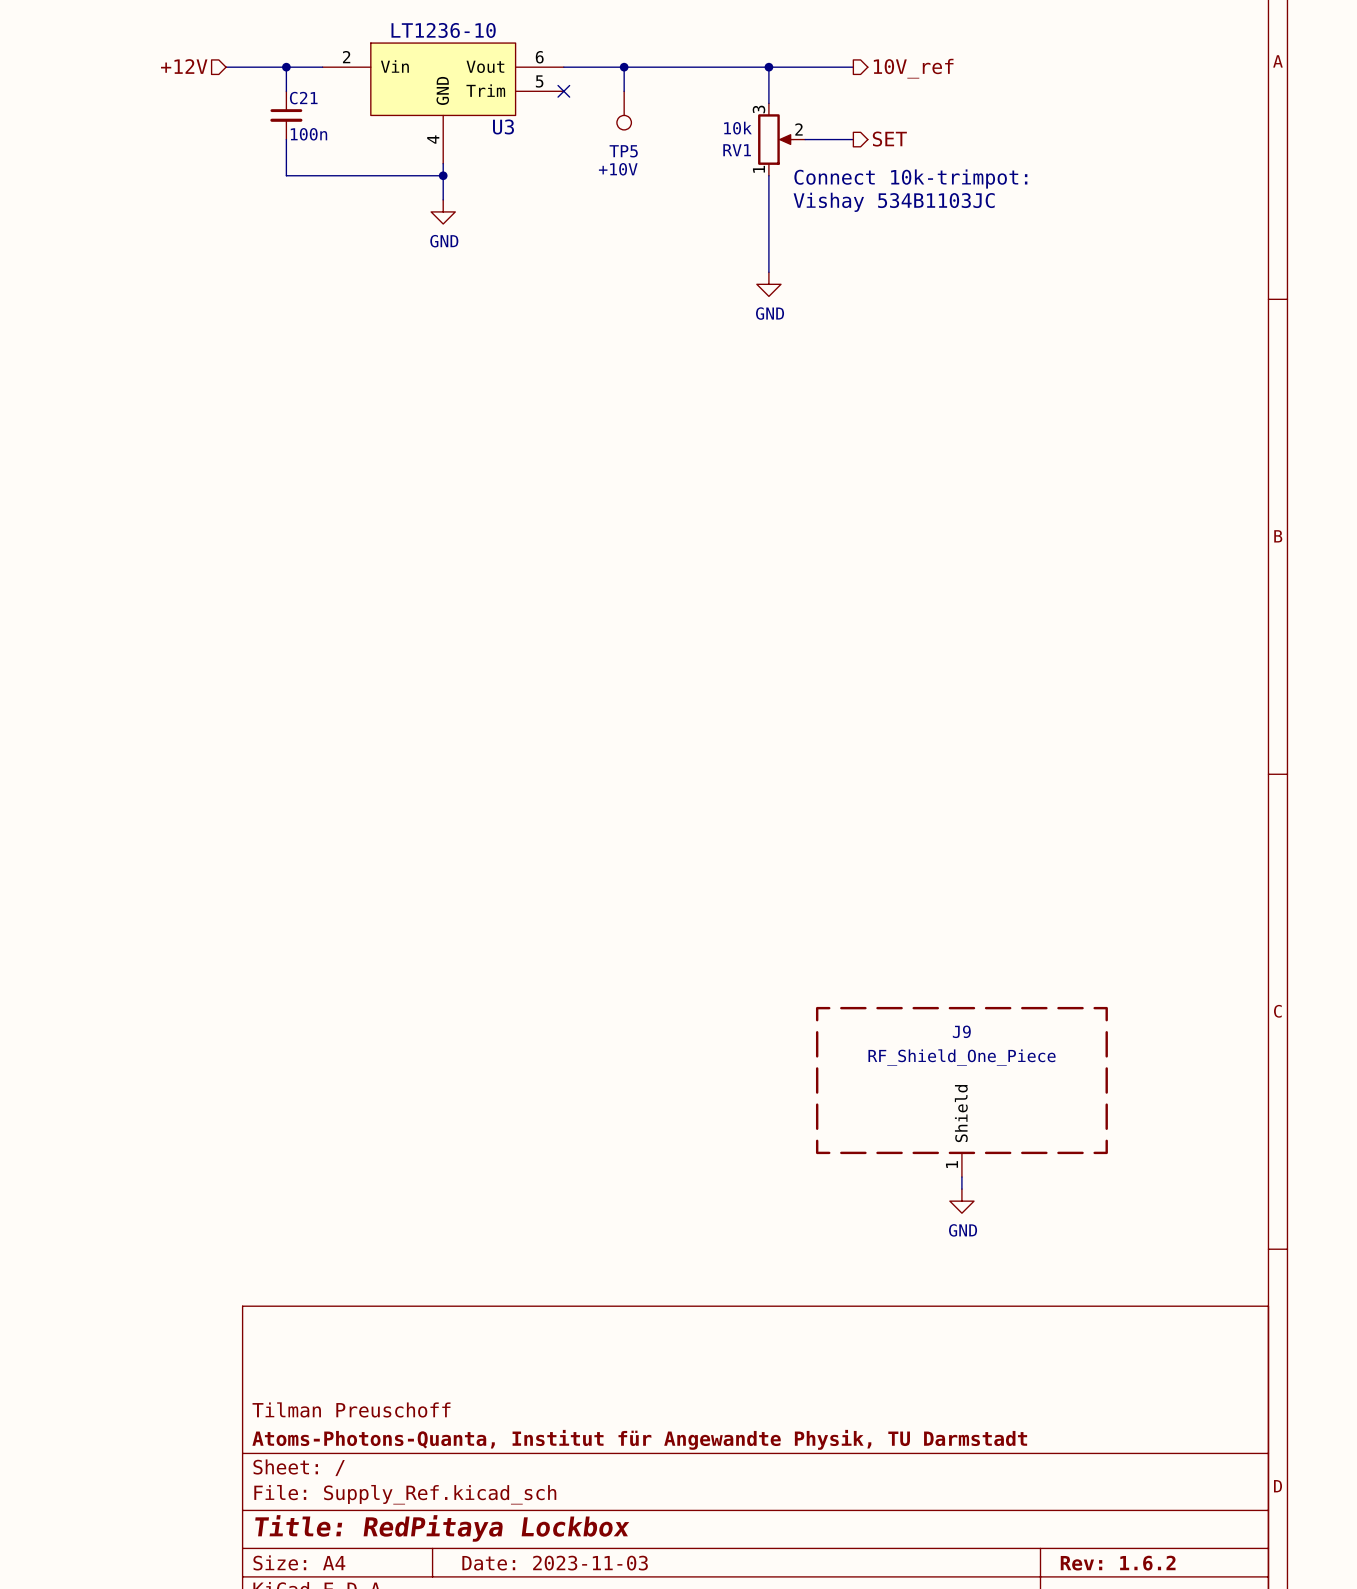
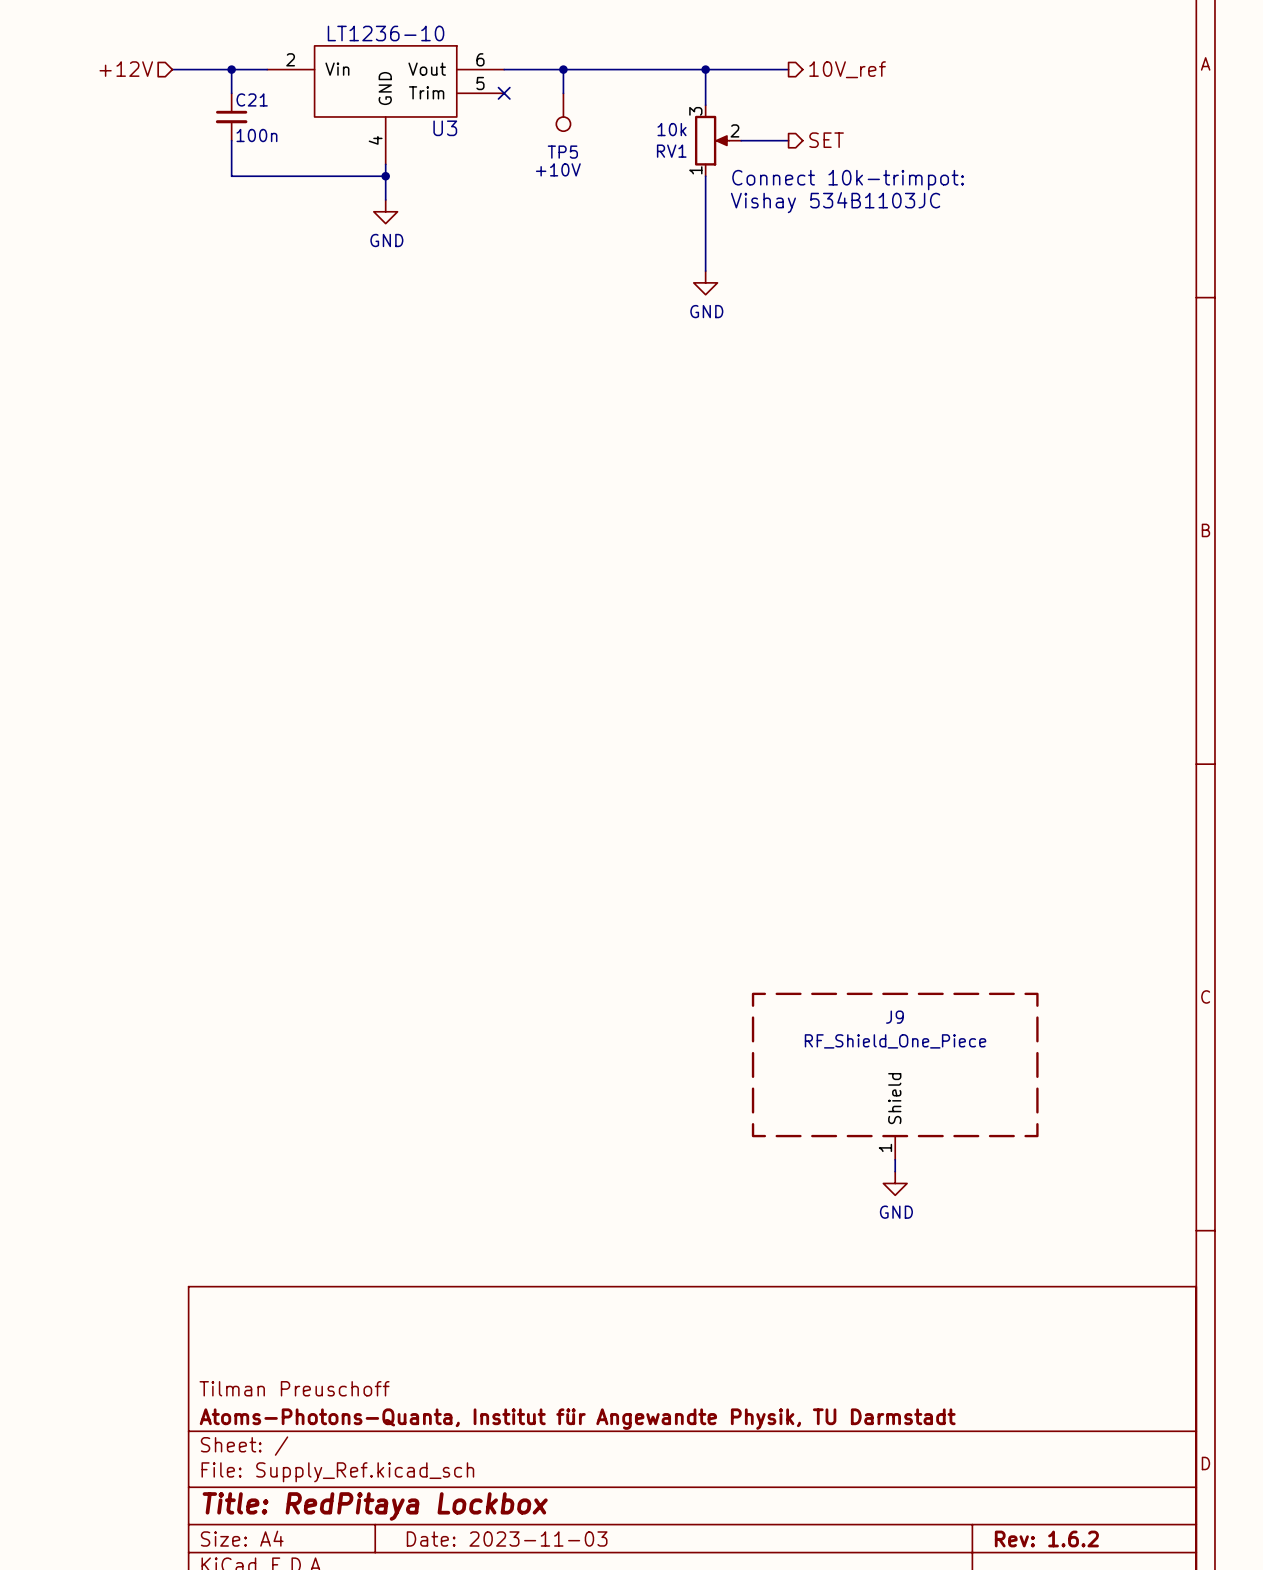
U3 symbol: [322, 43, 564, 164] -> [267, 45, 505, 165]

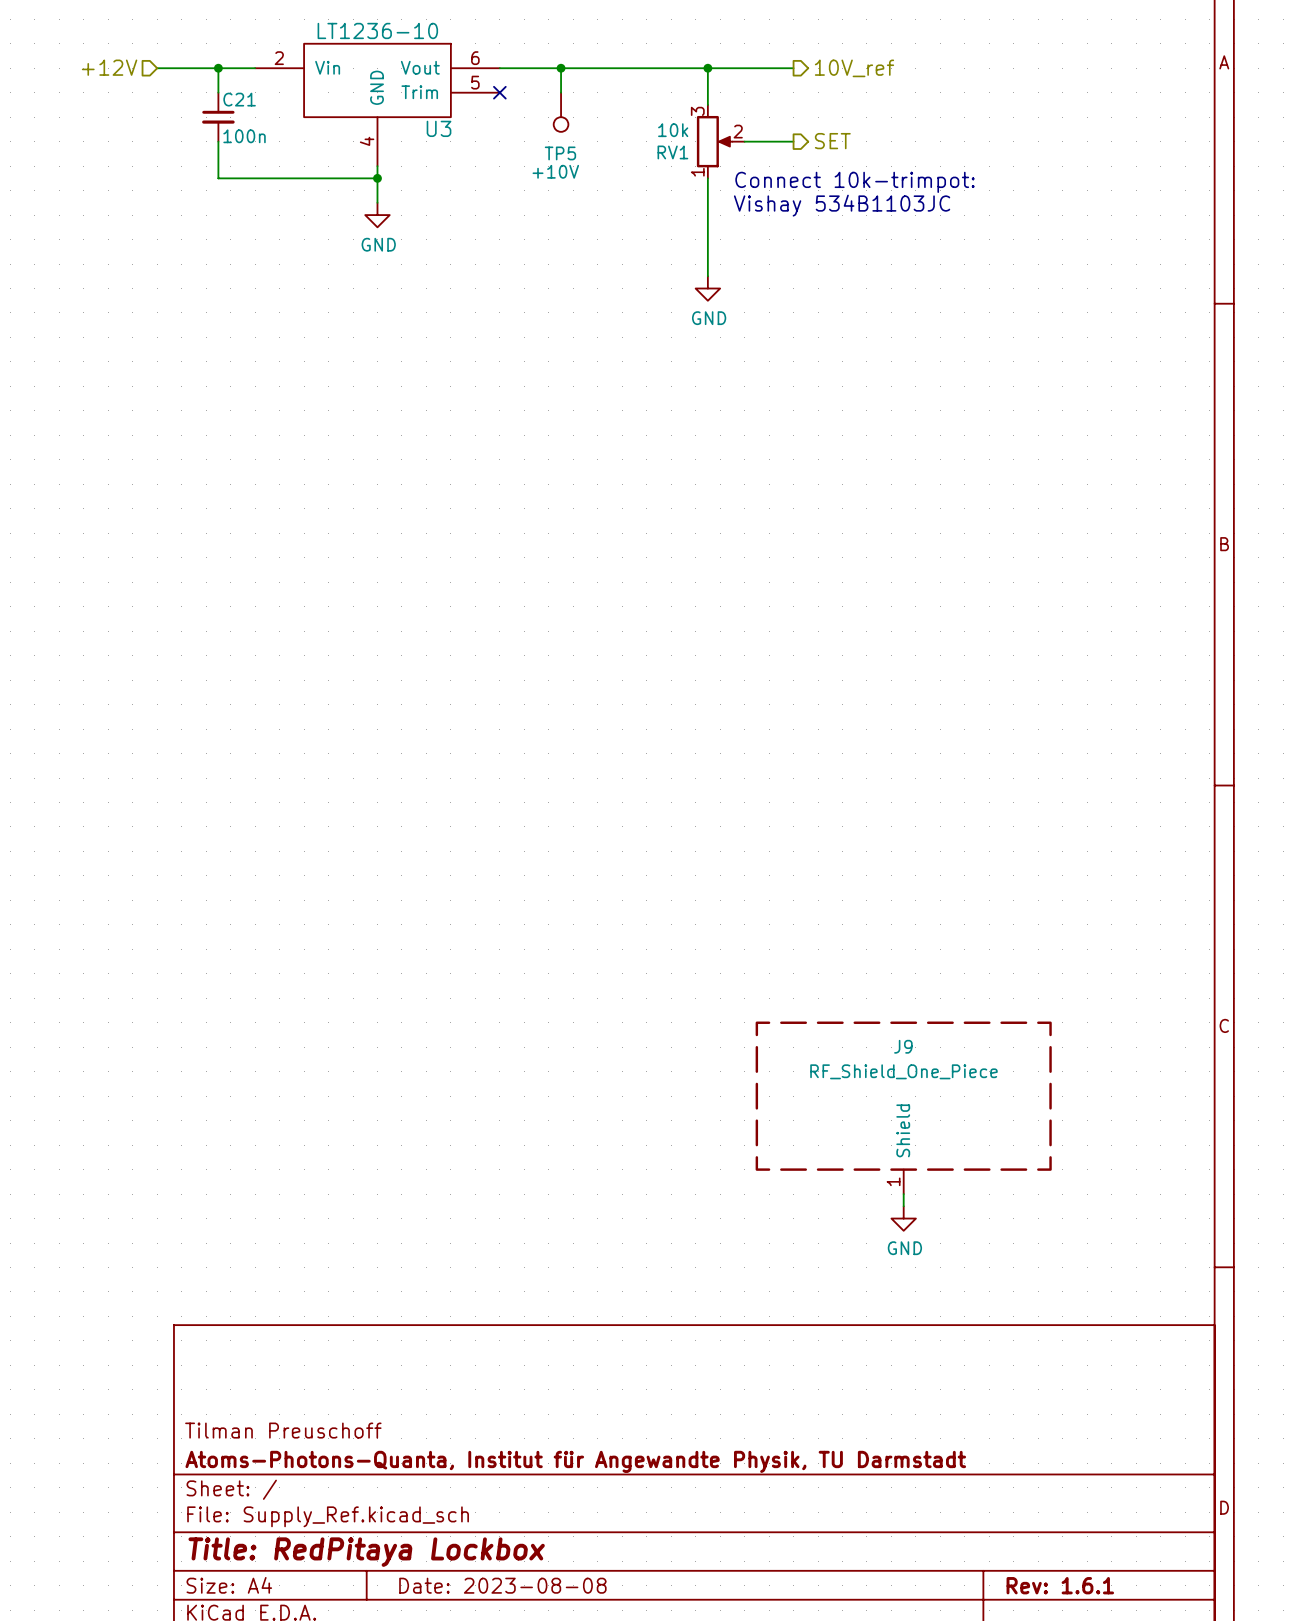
title block: Date: 2023-11-03 (507, 1538) -> Date: 2023-08-08 (502, 1585)
title block: Rev: 1.6.2 (1046, 1538) -> Rev: 1.6.1 (1060, 1585)

